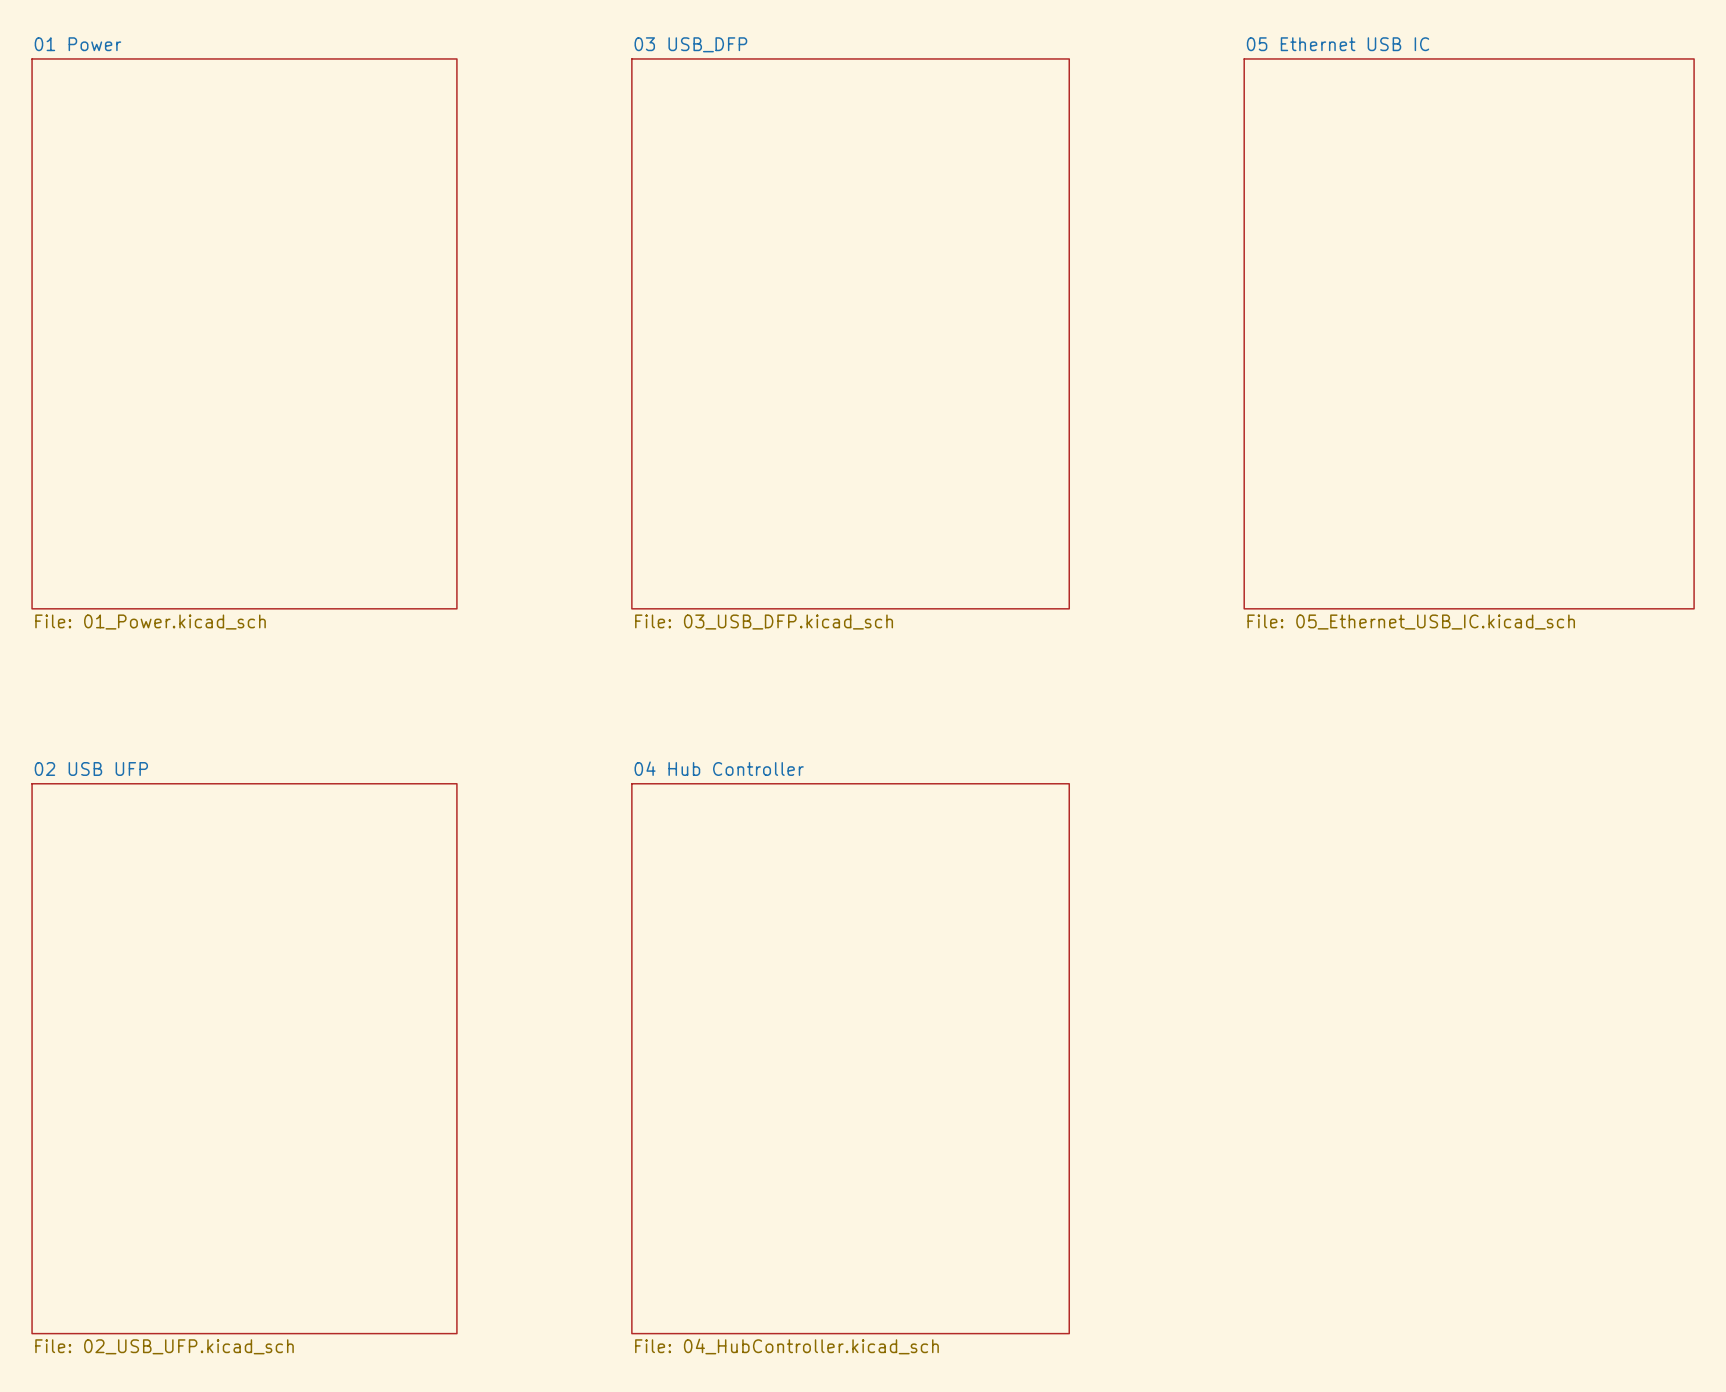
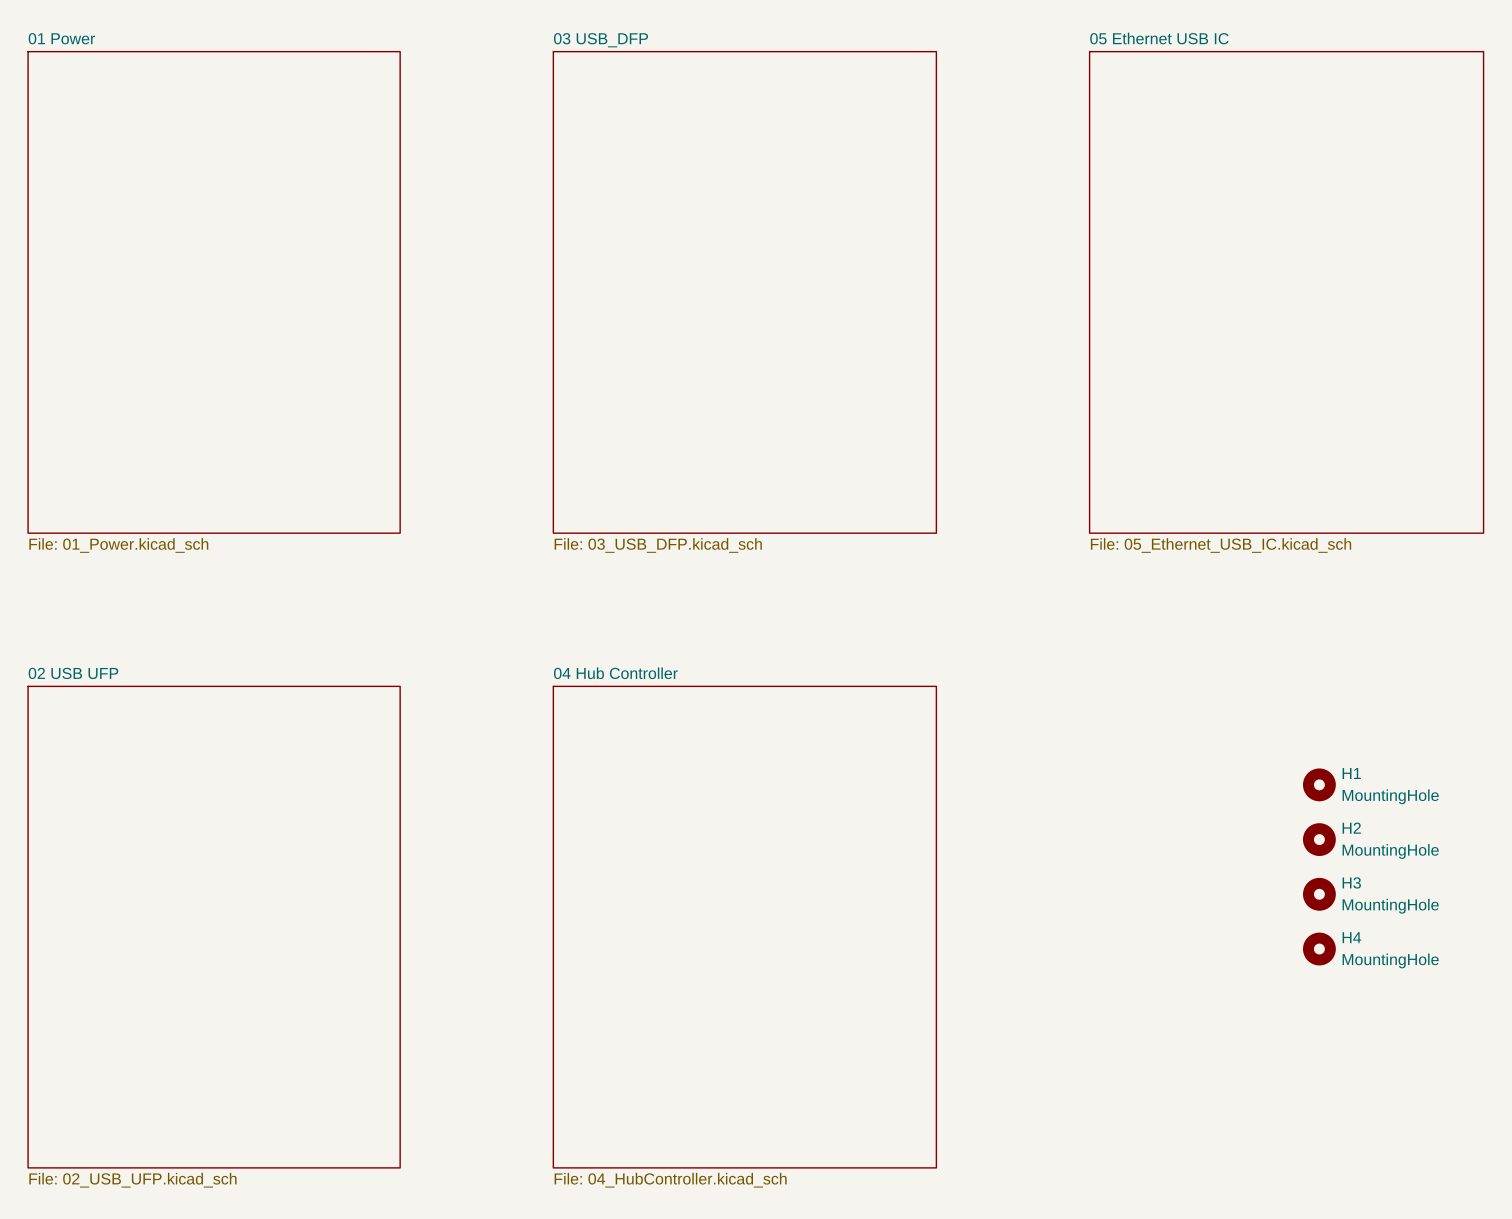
H1: none -> MountingHole (1319, 784)
H2: none -> MountingHole (1319, 839)
H3: none -> MountingHole (1319, 894)
H4: none -> MountingHole (1319, 949)

